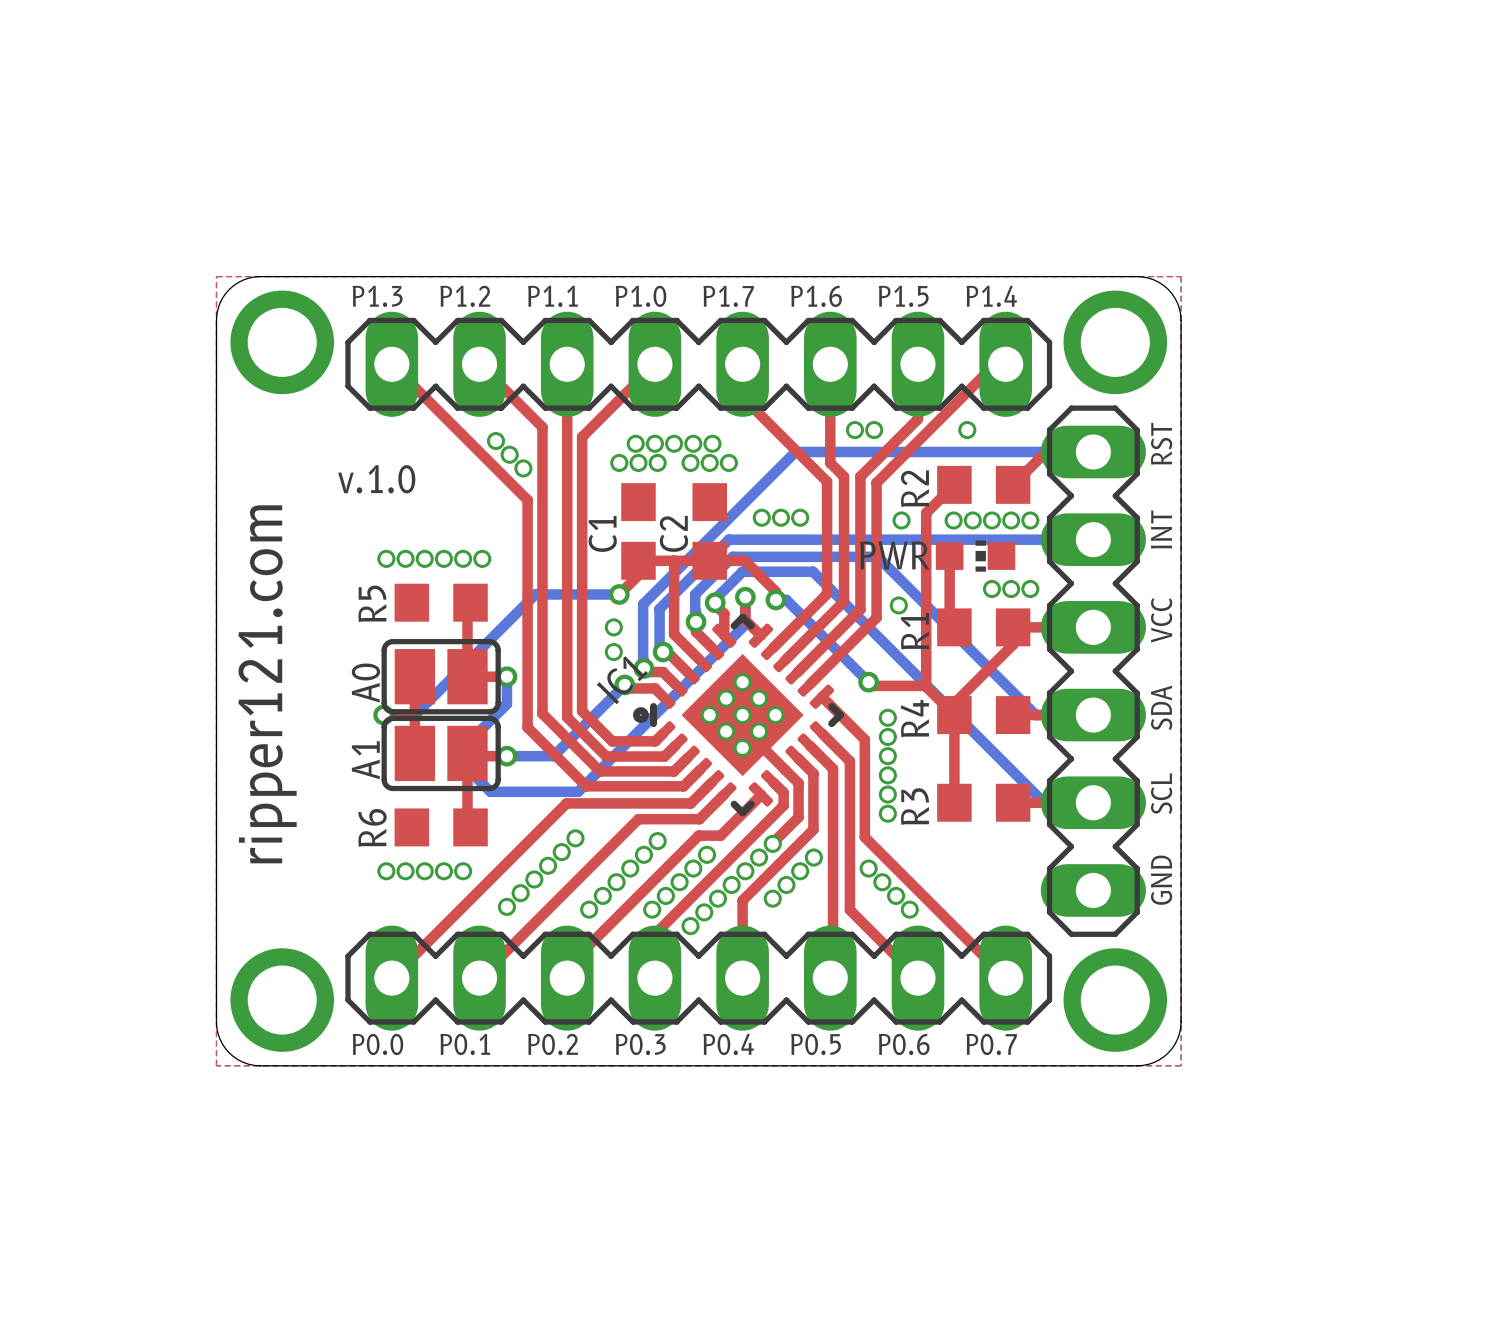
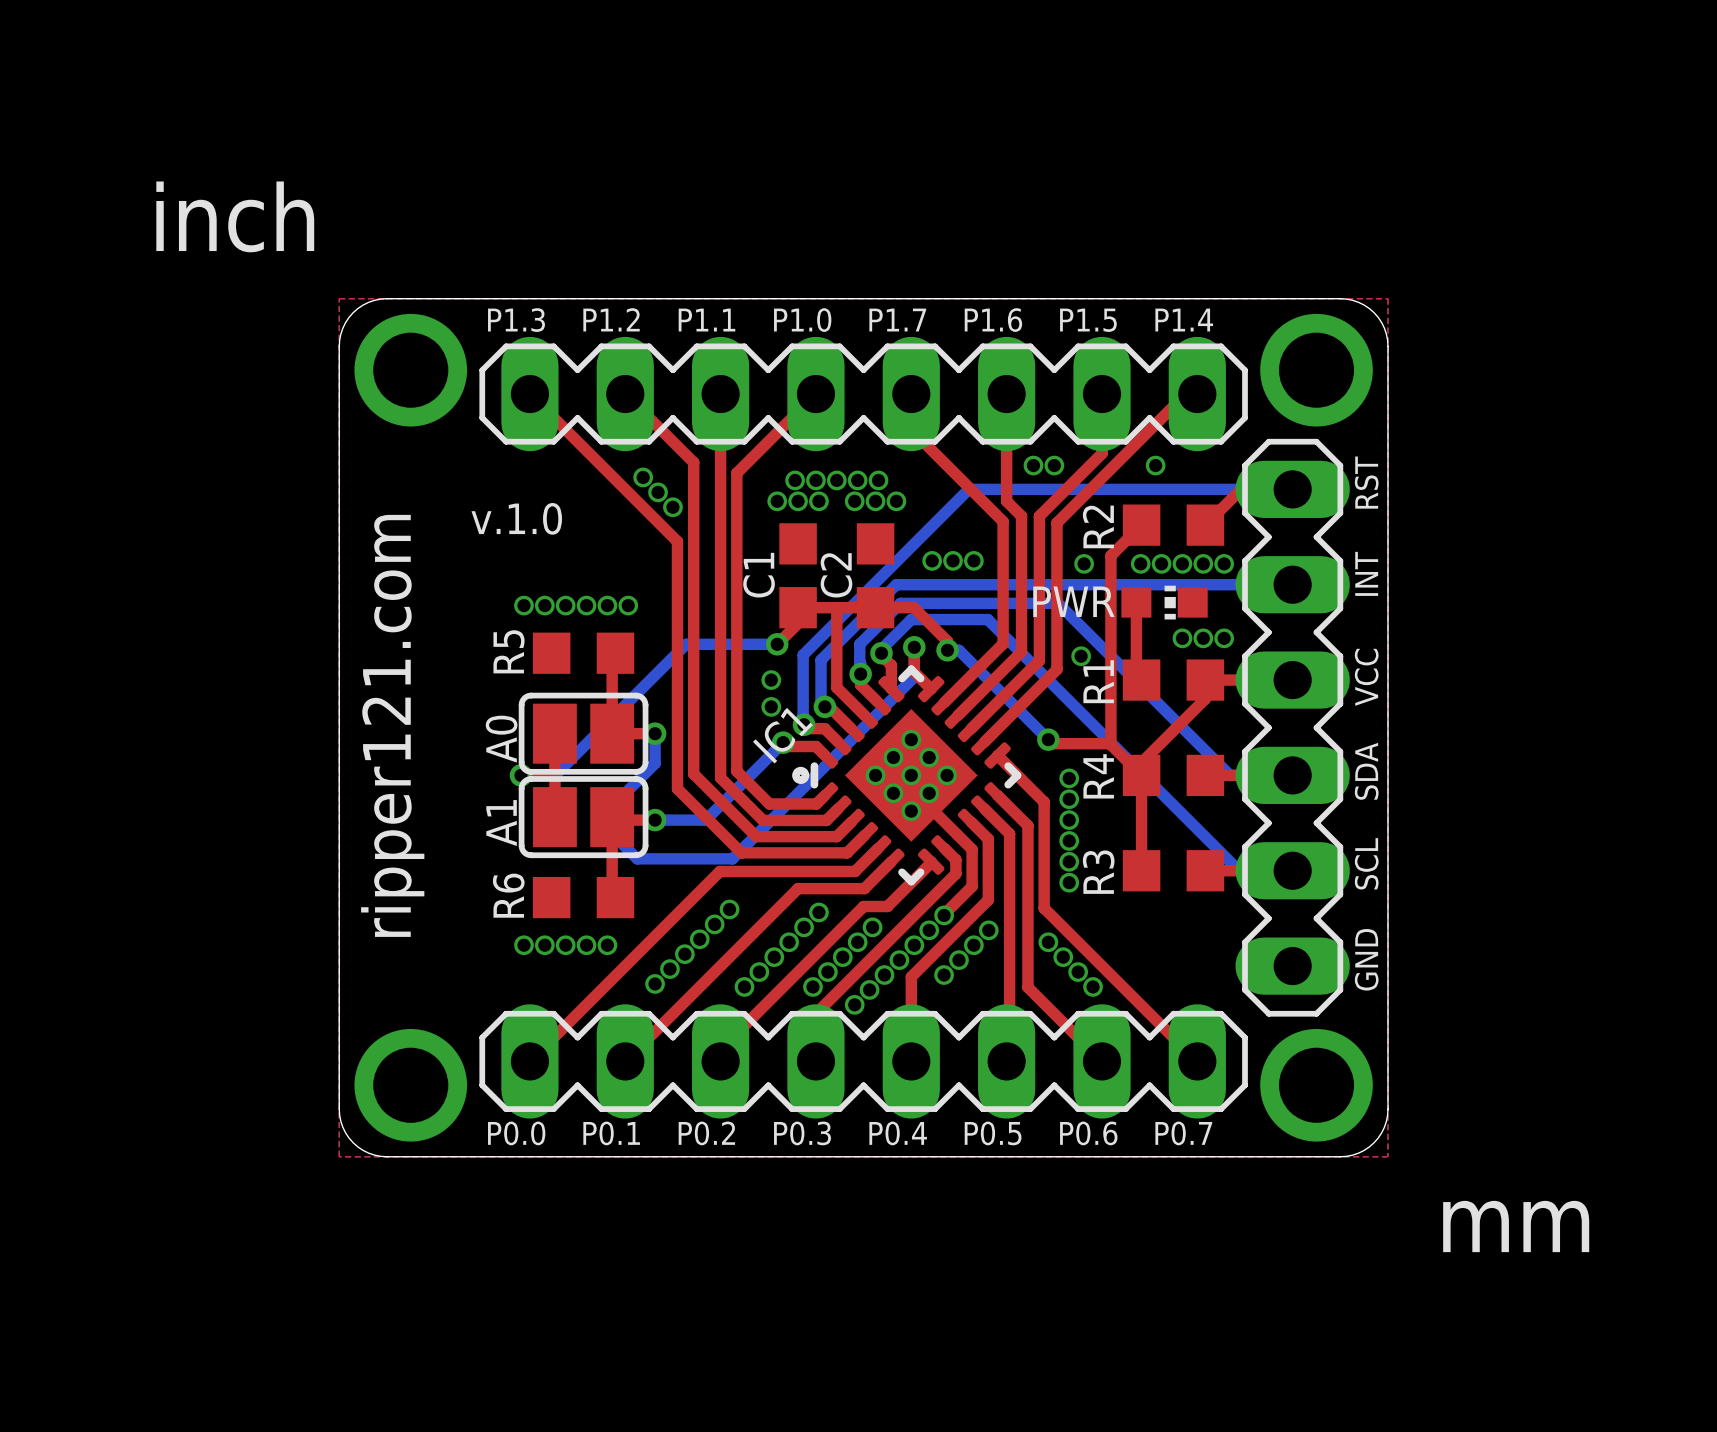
text: none -> inch (235, 216)
text: none -> mm (1516, 1226)

